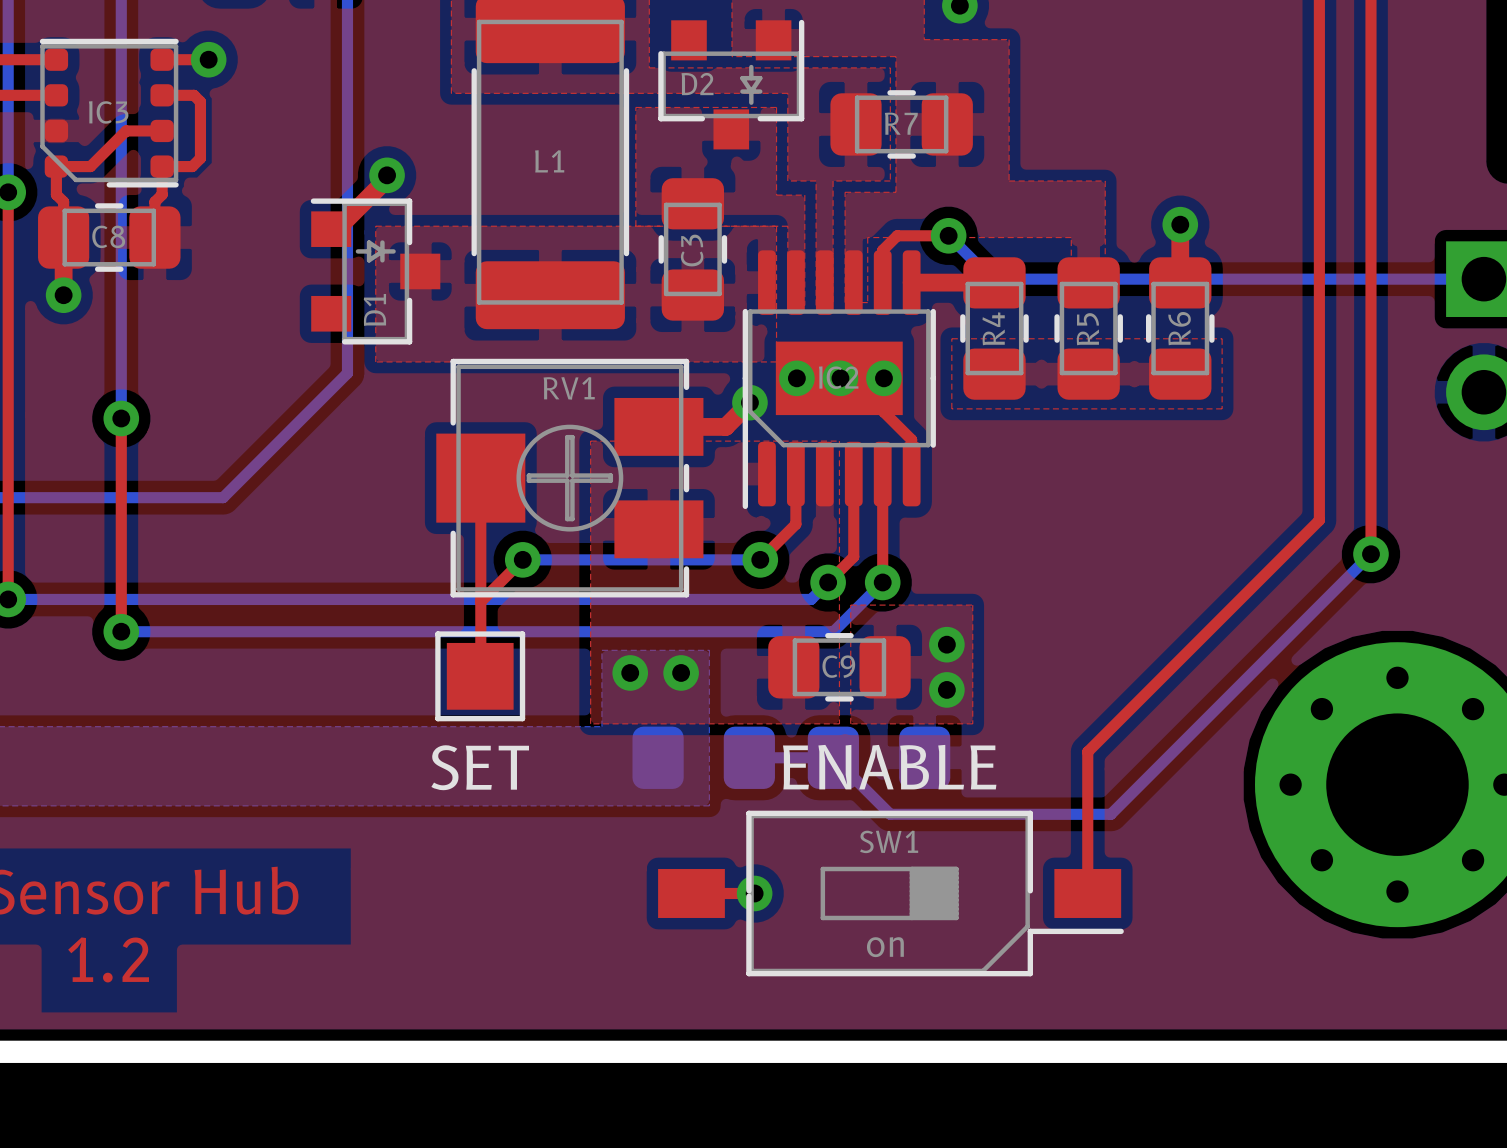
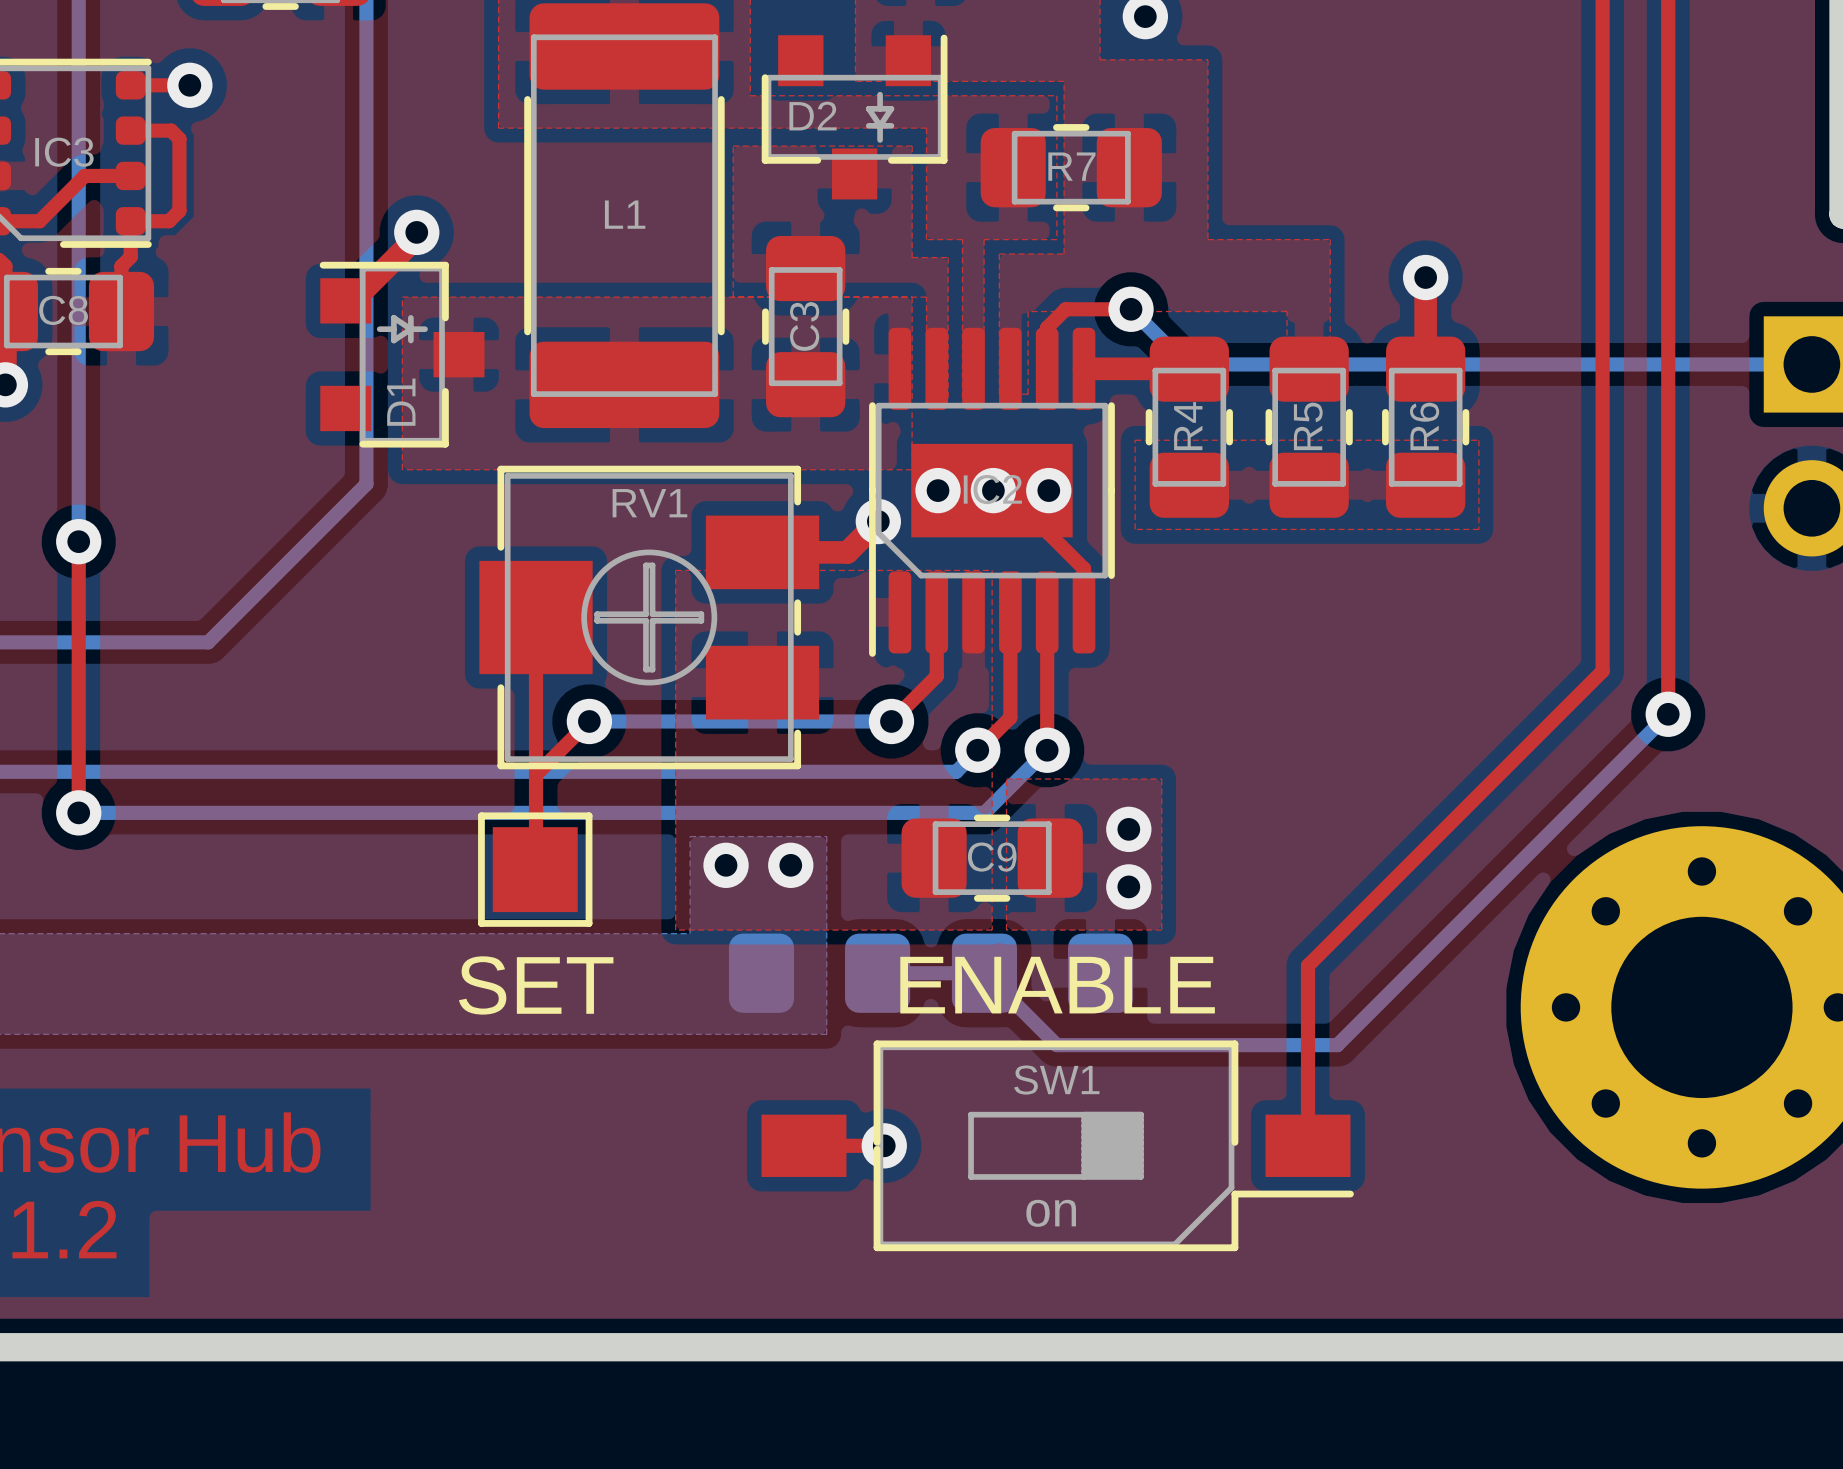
via position: (1180, 224) -> (1425, 277)

